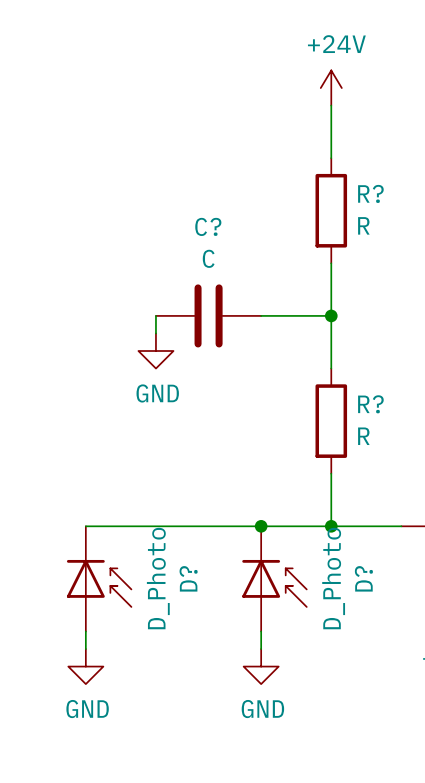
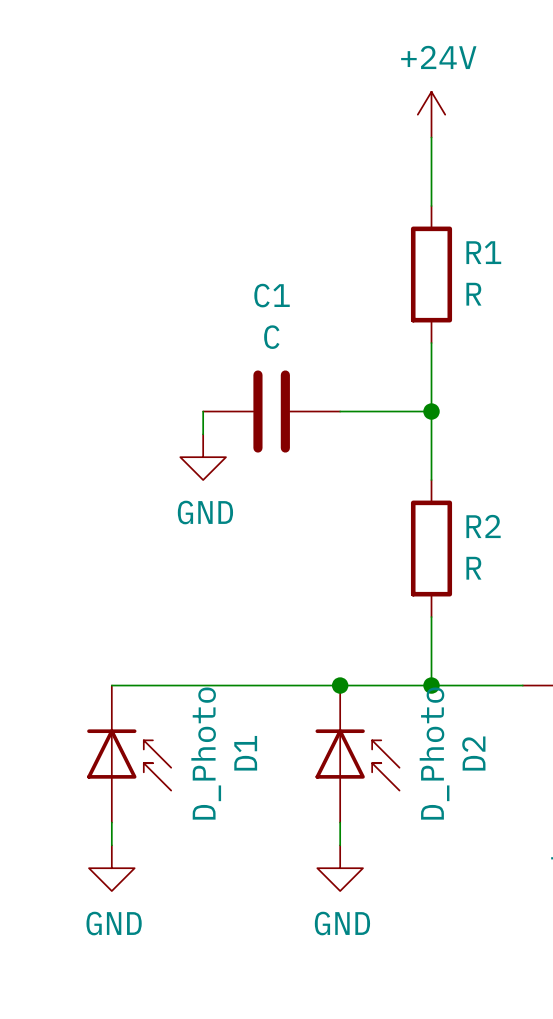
R? name: R? (370, 193) -> R1 (483, 252)
C? name: C? (208, 226) -> C1 (272, 295)
R? name: R? (370, 404) -> R2 (483, 526)
D? name: D? (188, 578) -> D1 (245, 753)
D? name: D? (363, 578) -> D2 (473, 753)

